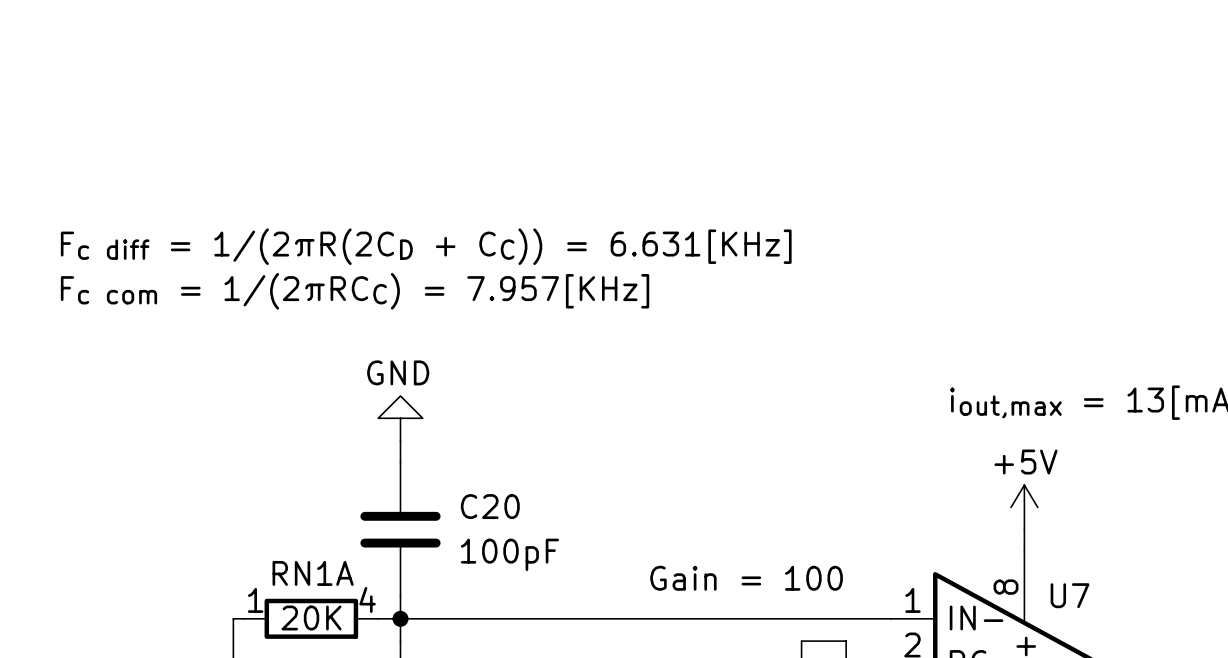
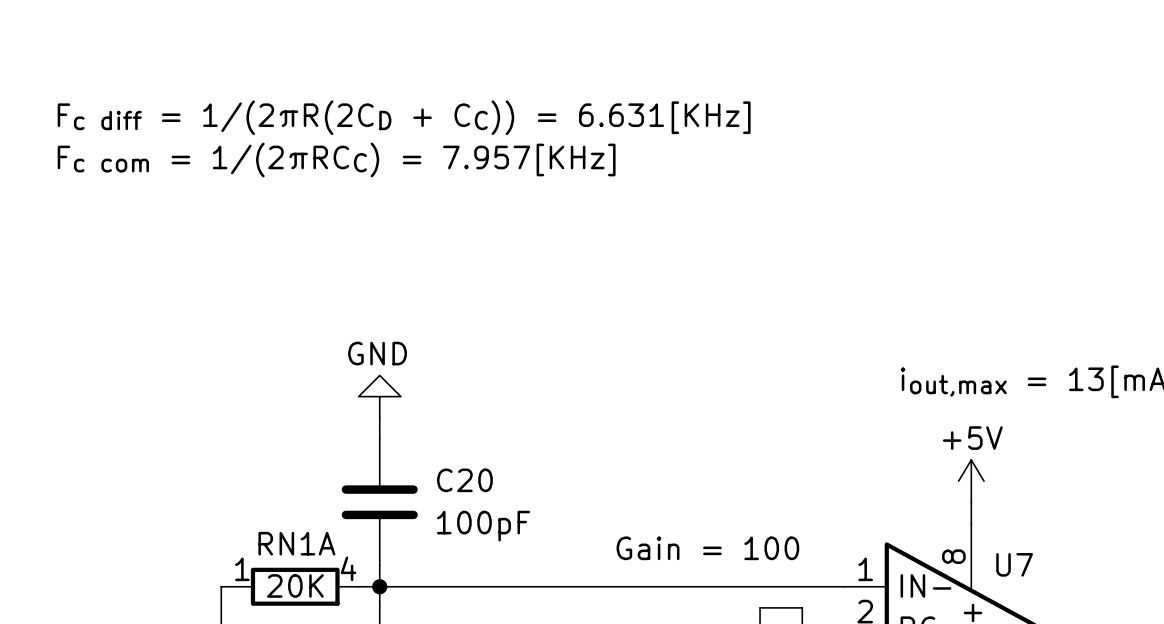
text position: Fc diff = 1/(2πR(2CD + CC)) = 6.631[KHz] (426, 246) -> Fc diff = 1/(2πR(2CD + CC)) = 6.631[KHz] (404, 117)
text position: Fc com = 1/(2πRCC) = 7.957[KHz] (355, 291) -> Fc com = 1/(2πRCC) = 7.957[KHz] (336, 159)

